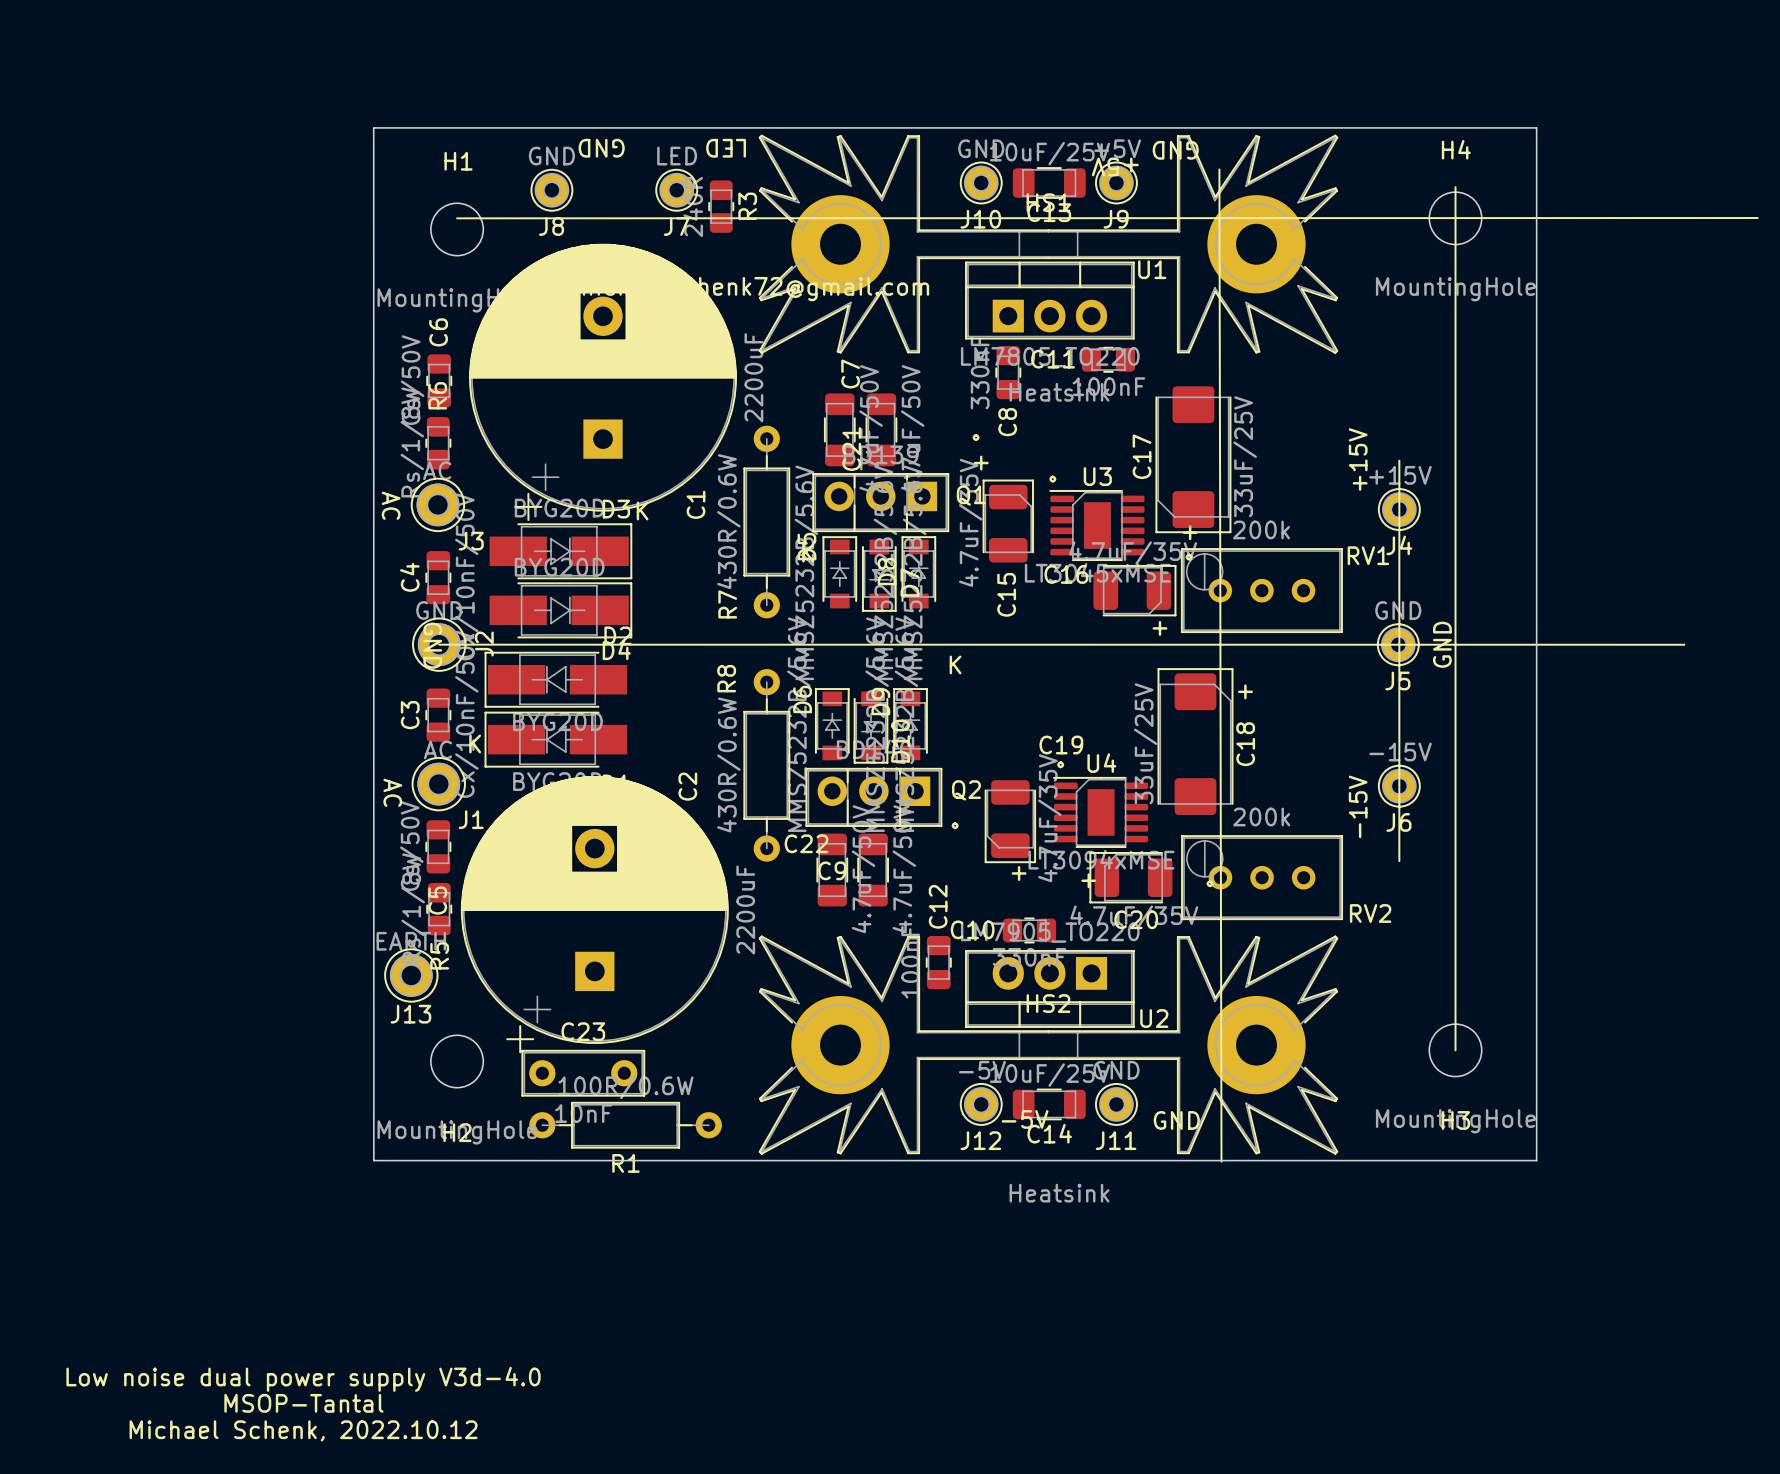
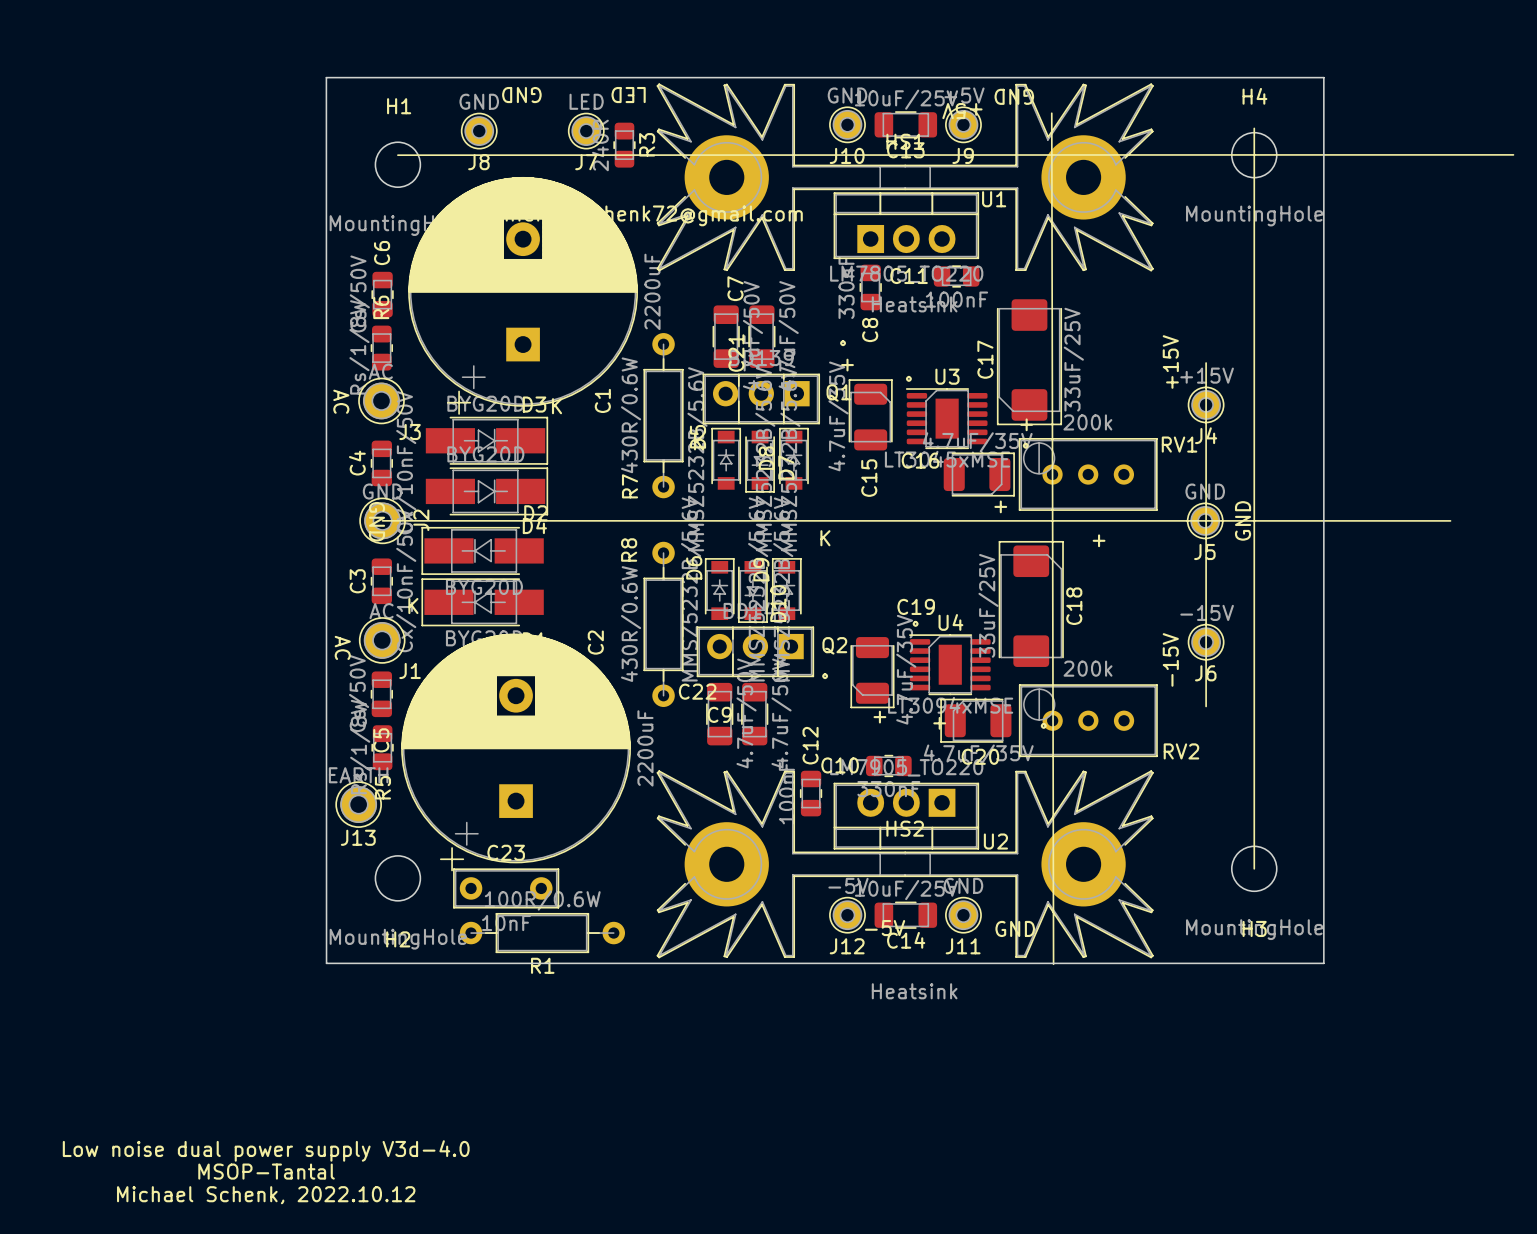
text position: + (1245, 691) -> + (1099, 540)

